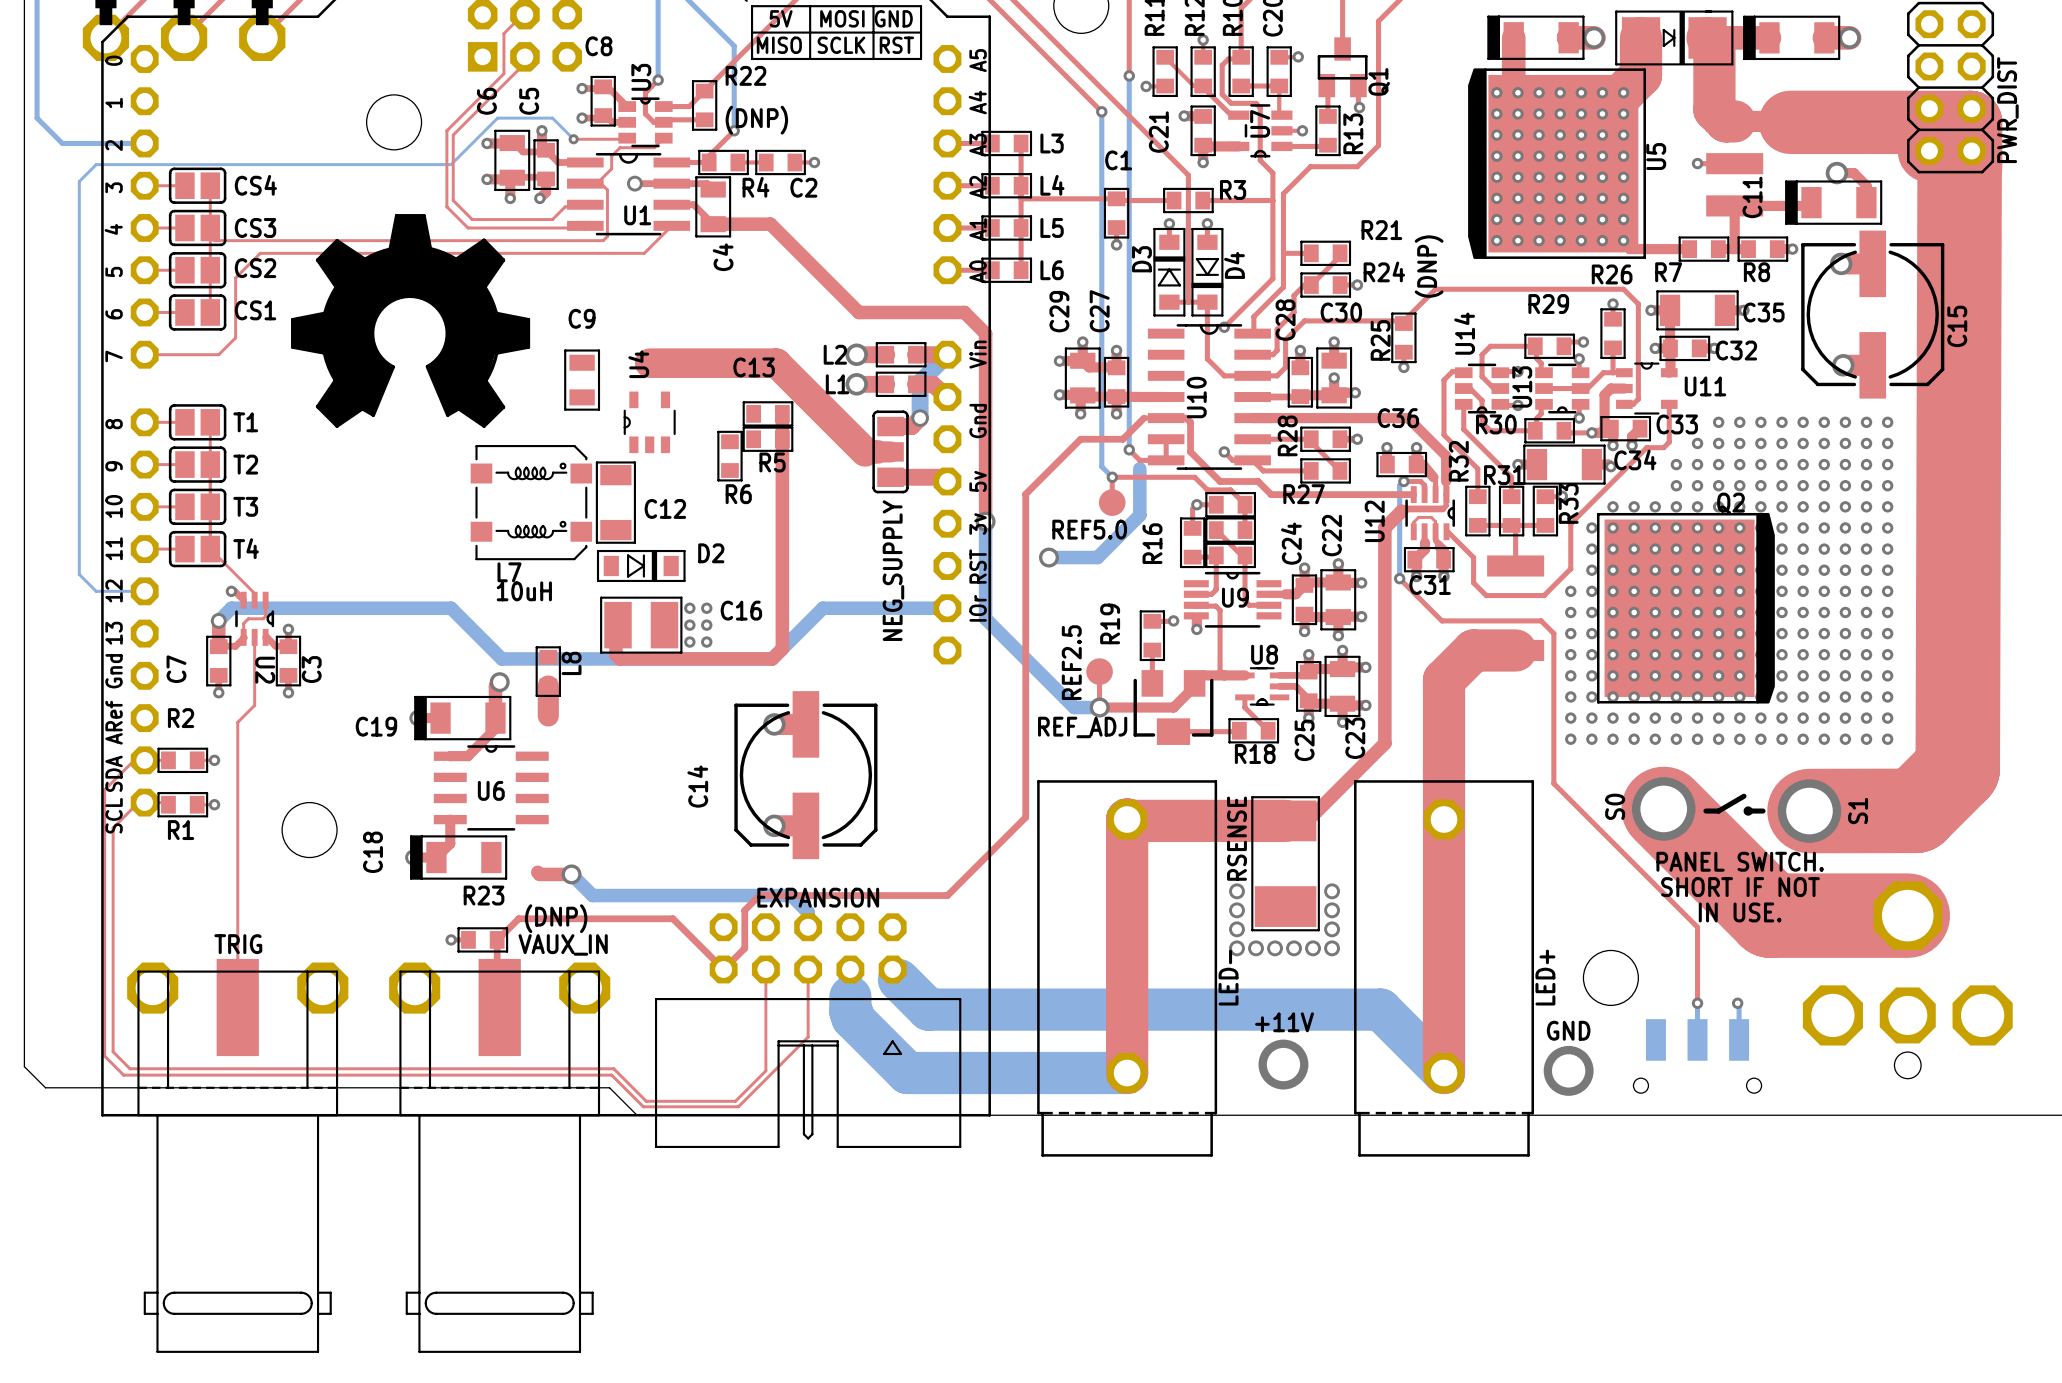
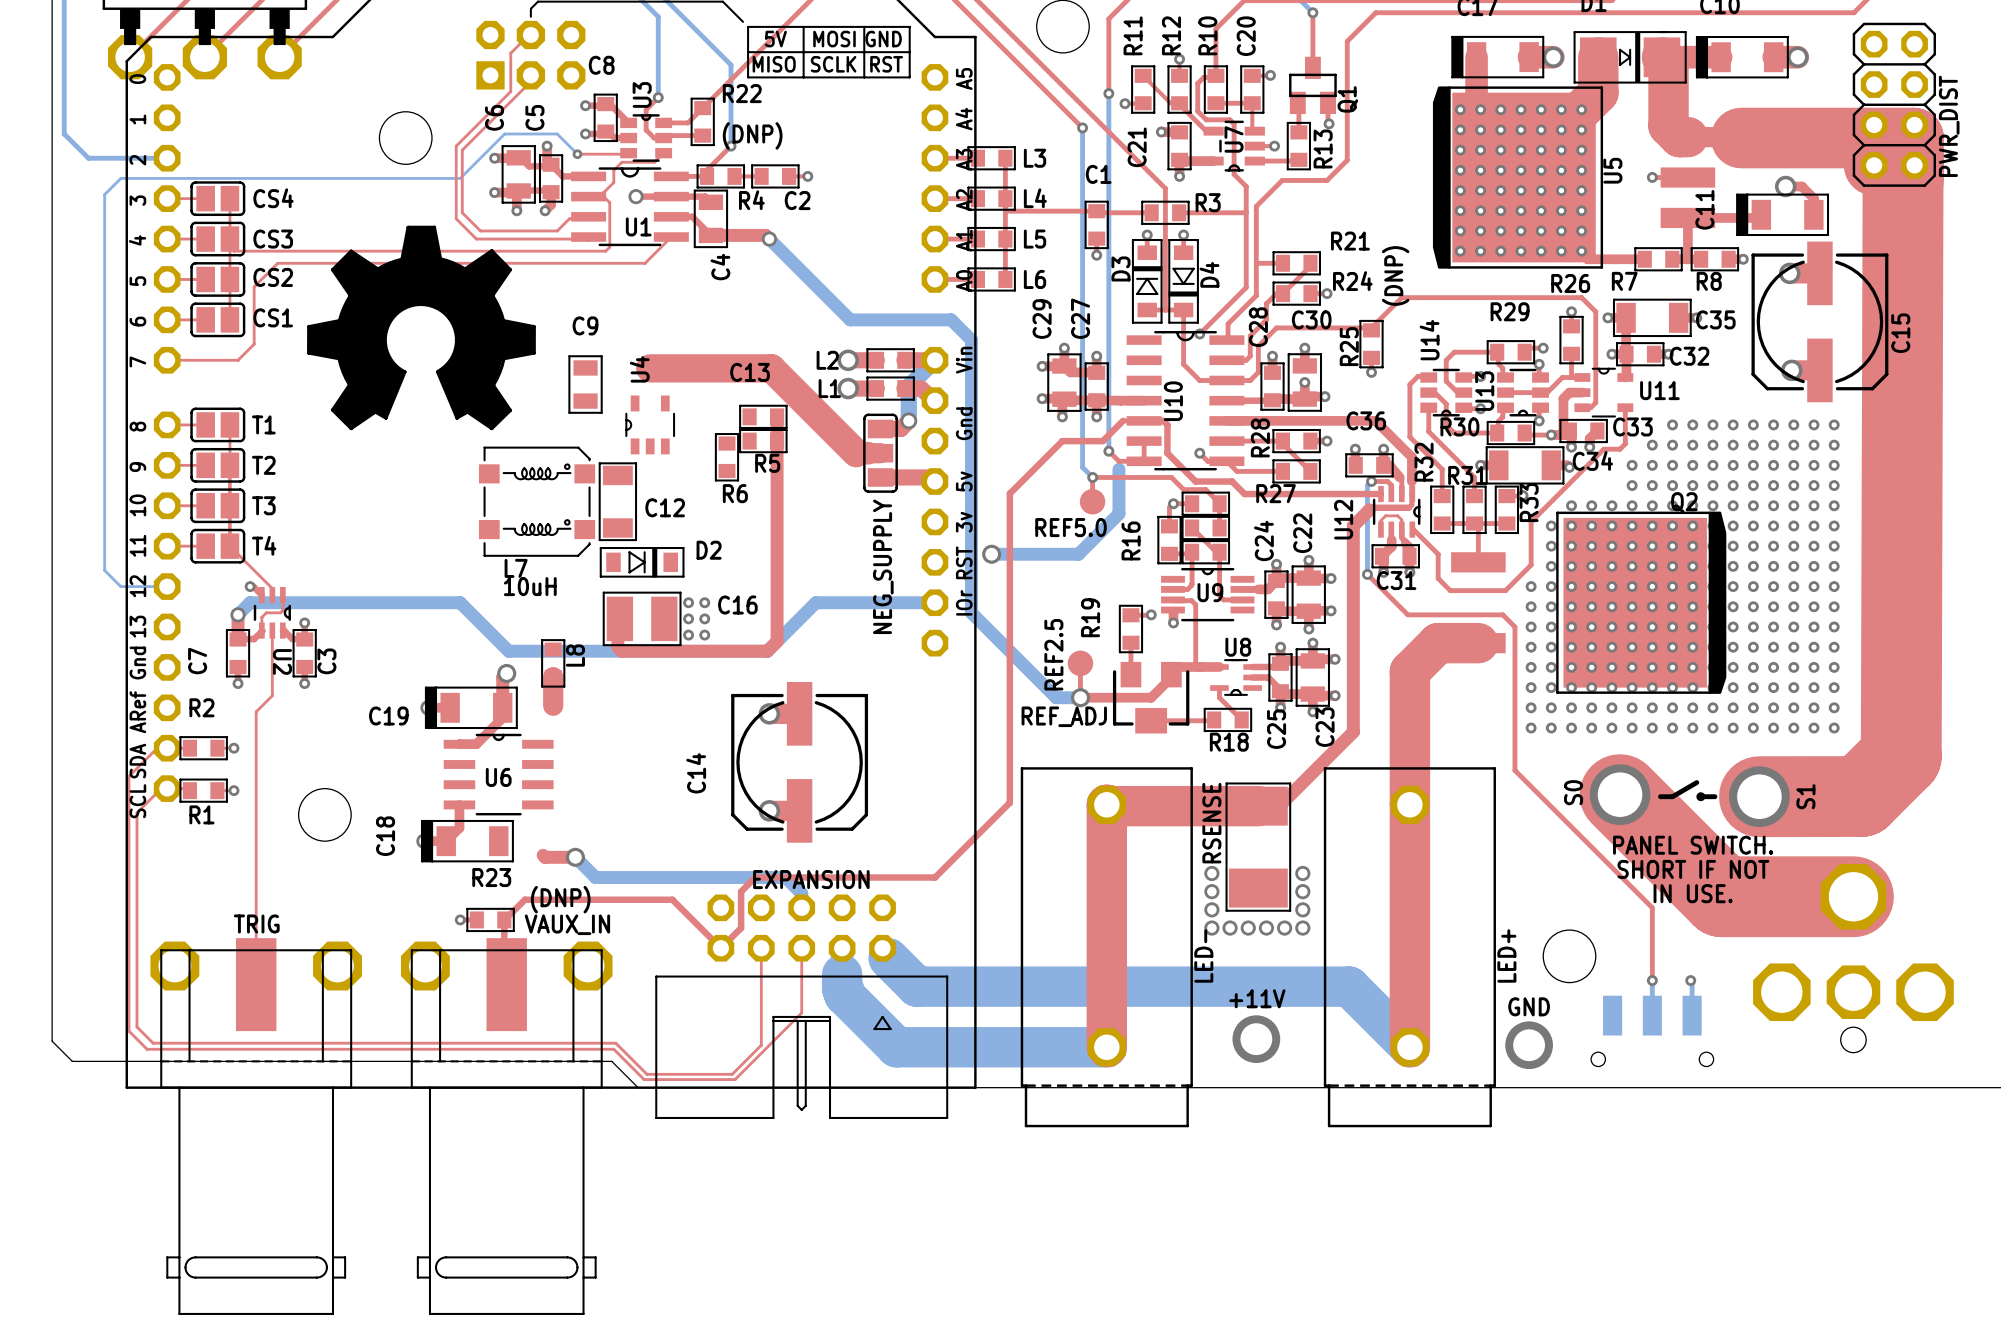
top track: (774, 227) (858, 312) (964, 312) (985, 333) (985, 521) -> none
bottom track: none -> (769, 239) (850, 319) (951, 319) (971, 340) (971, 519)
via: none -> (769, 239)
via: (985, 521) -> none
bottom track: none -> (991, 554) (1032, 554)
via: none -> (991, 554)
via: (1048, 557) -> none

